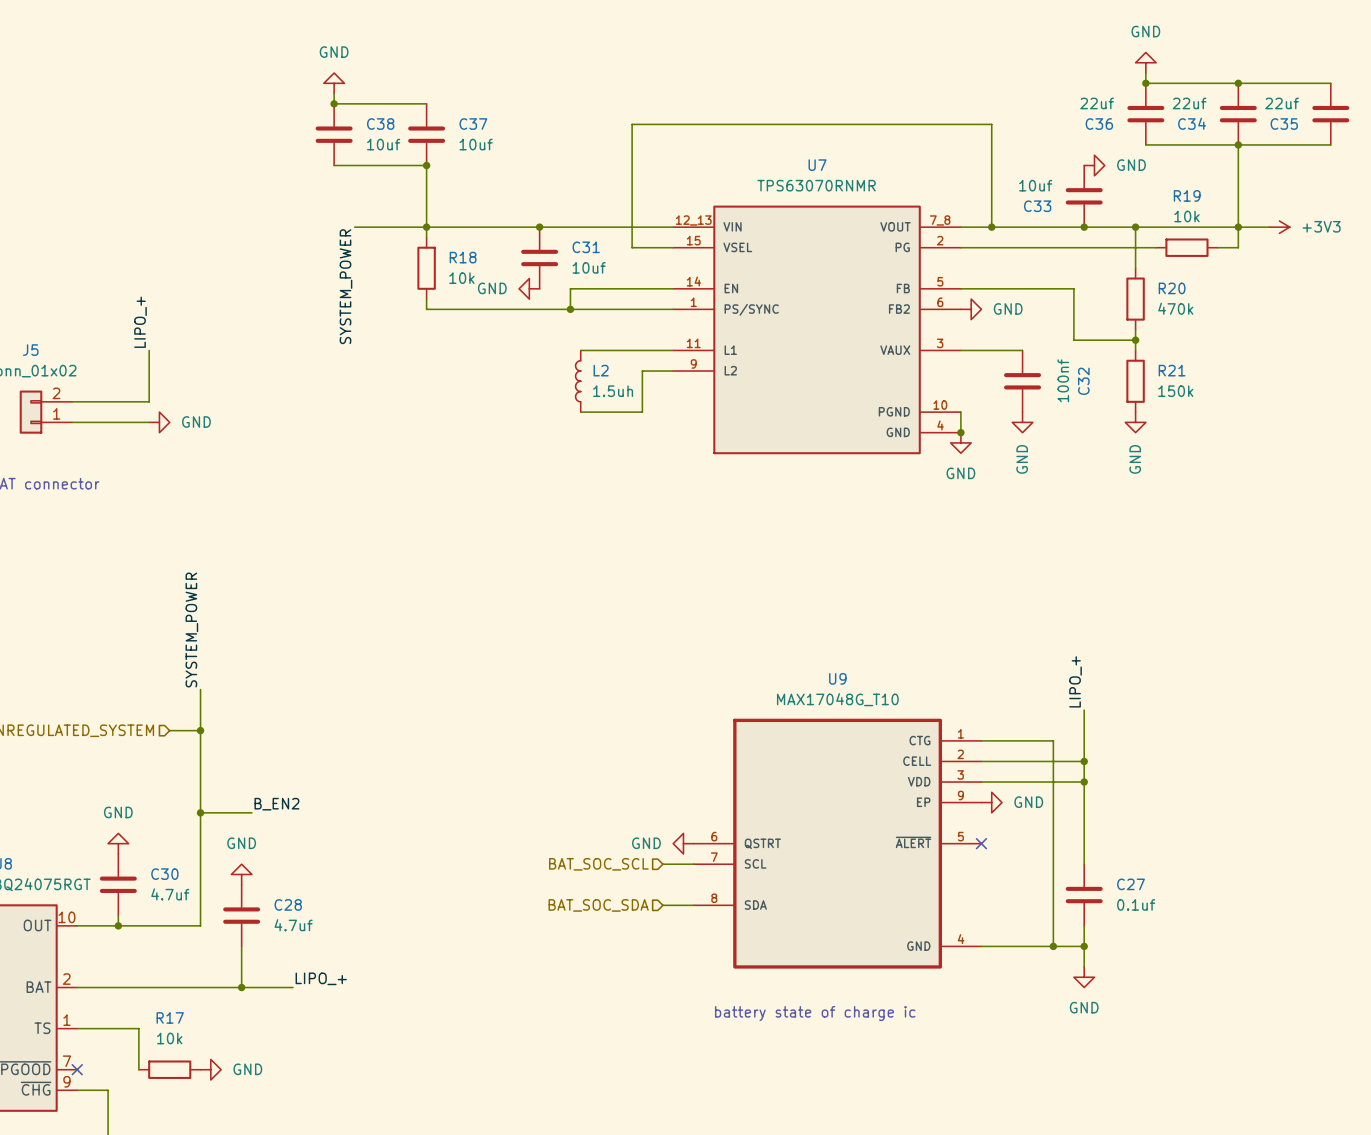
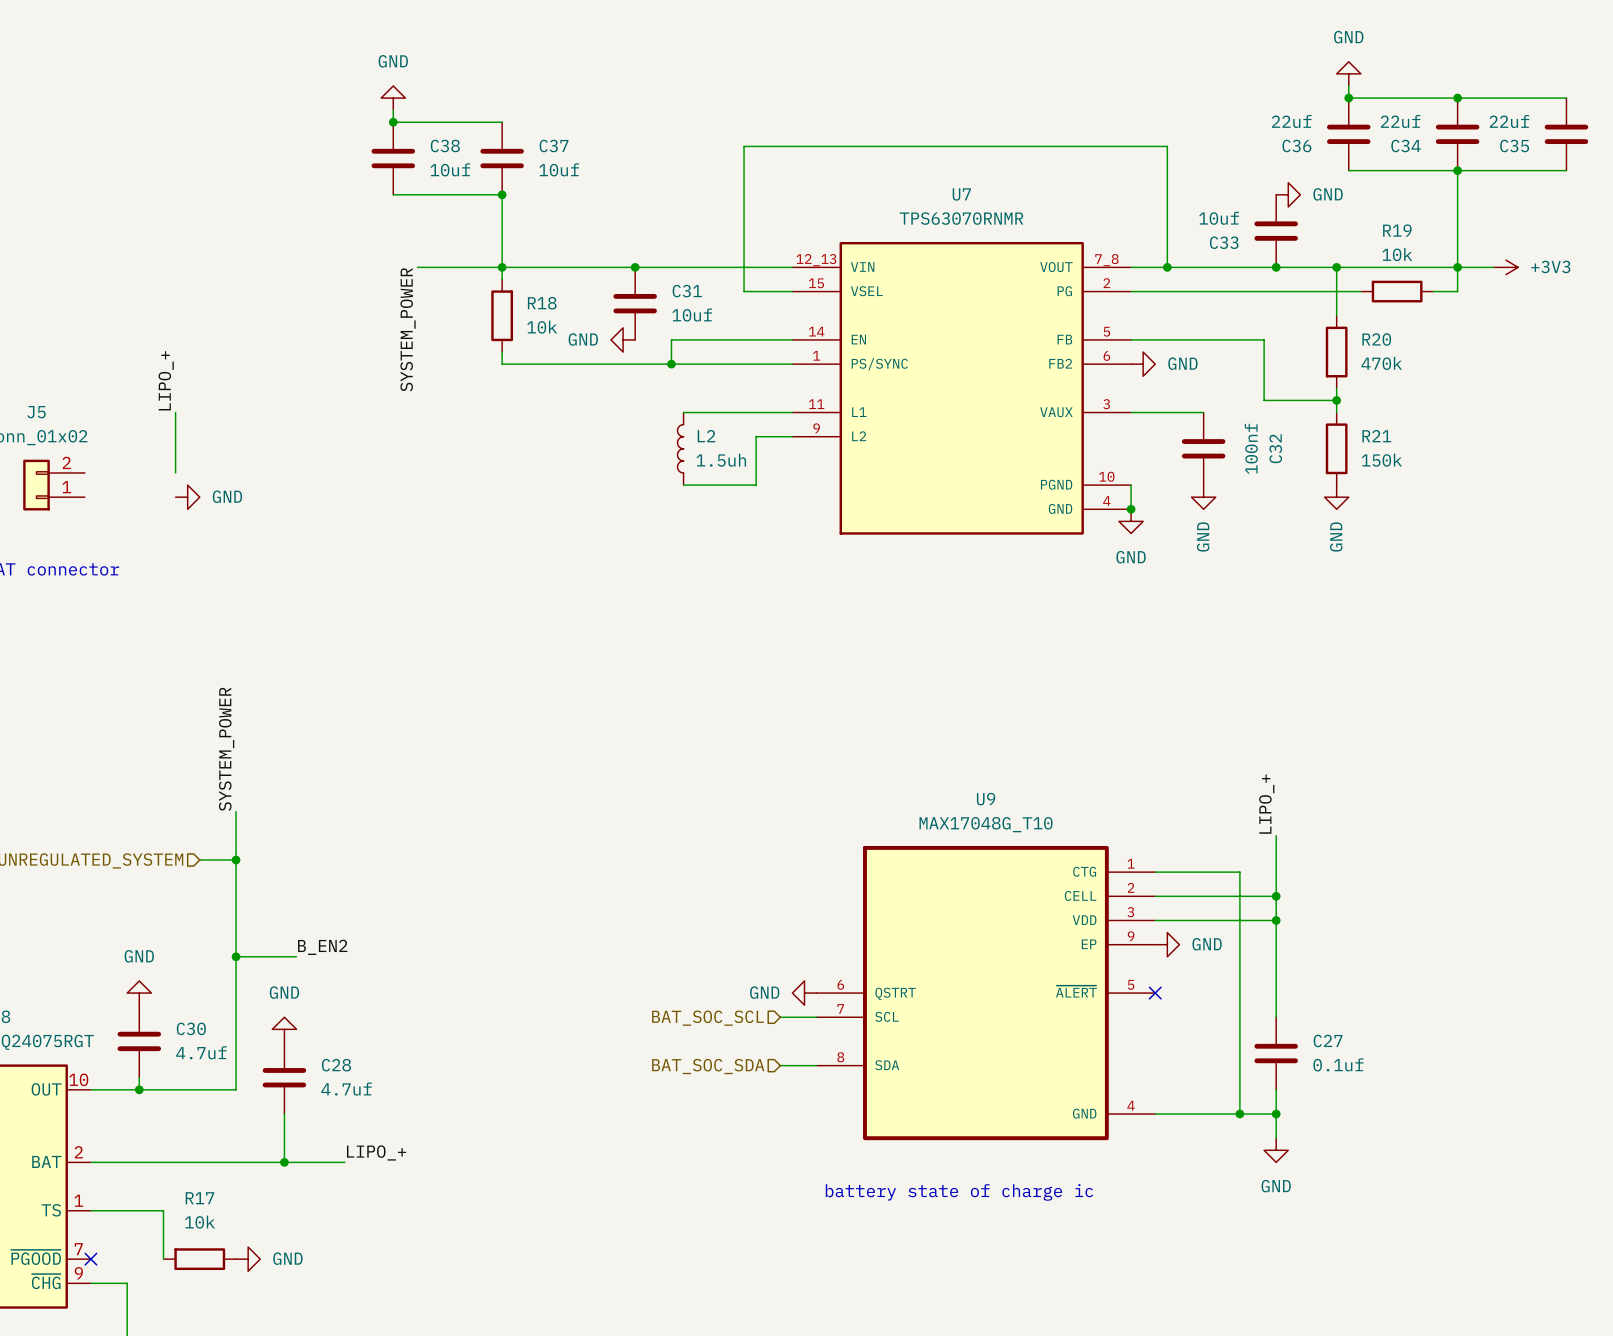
wire: (72, 401) (149, 401) -> none
wire: (72, 422) (149, 422) -> none

